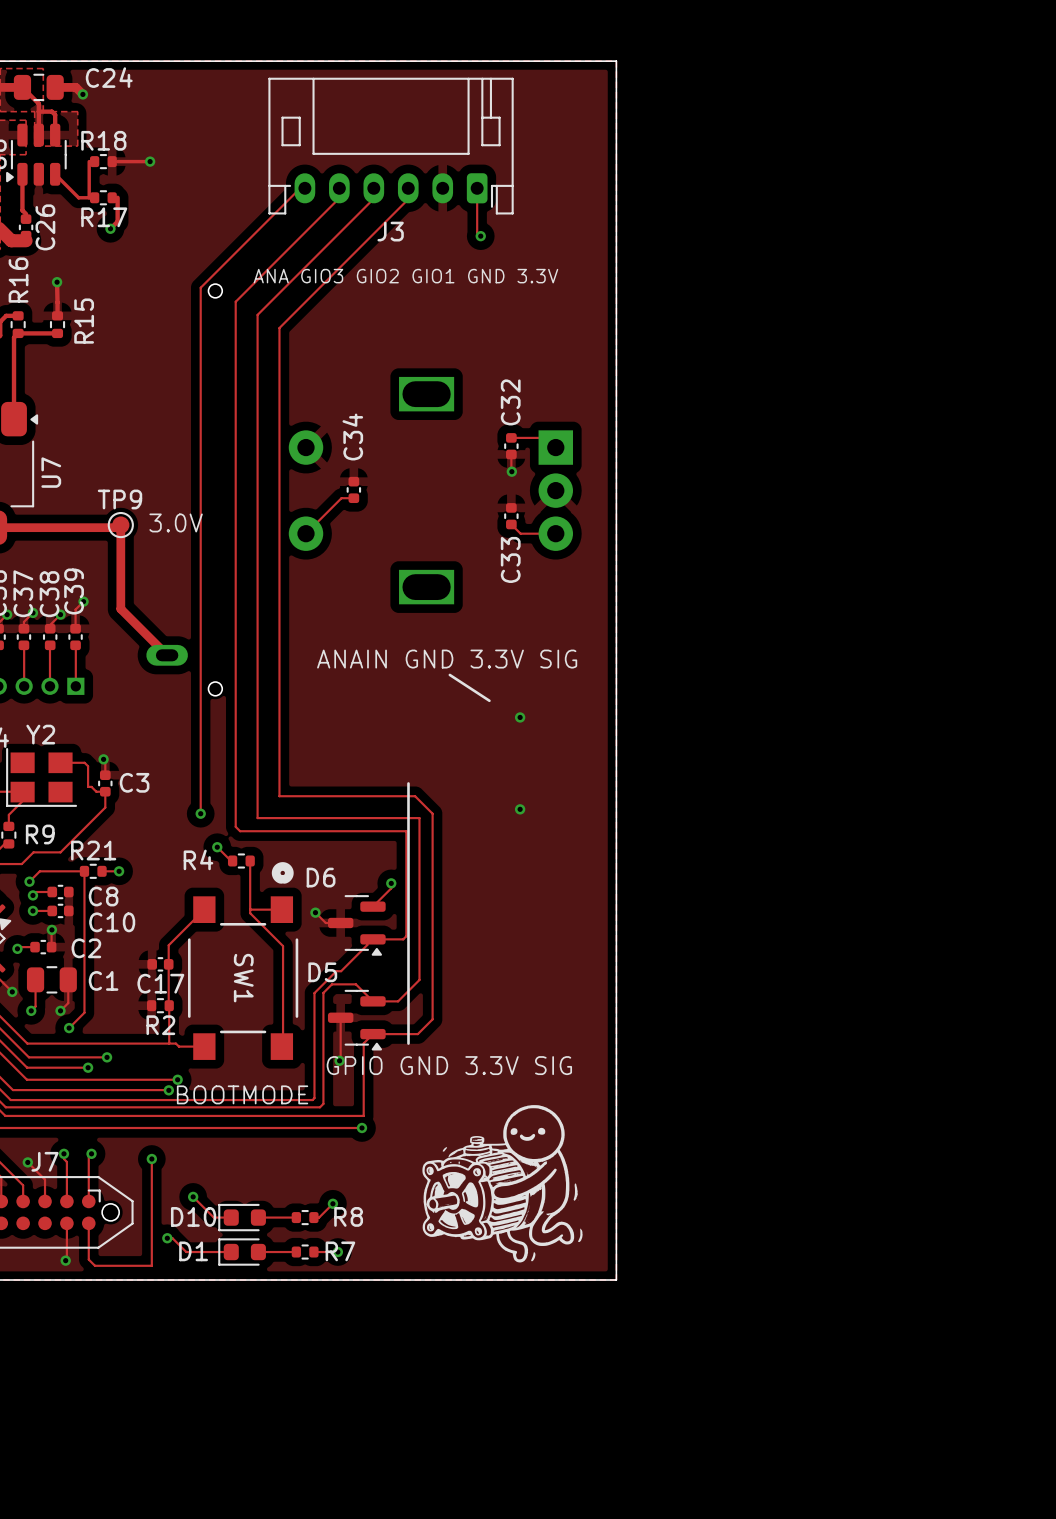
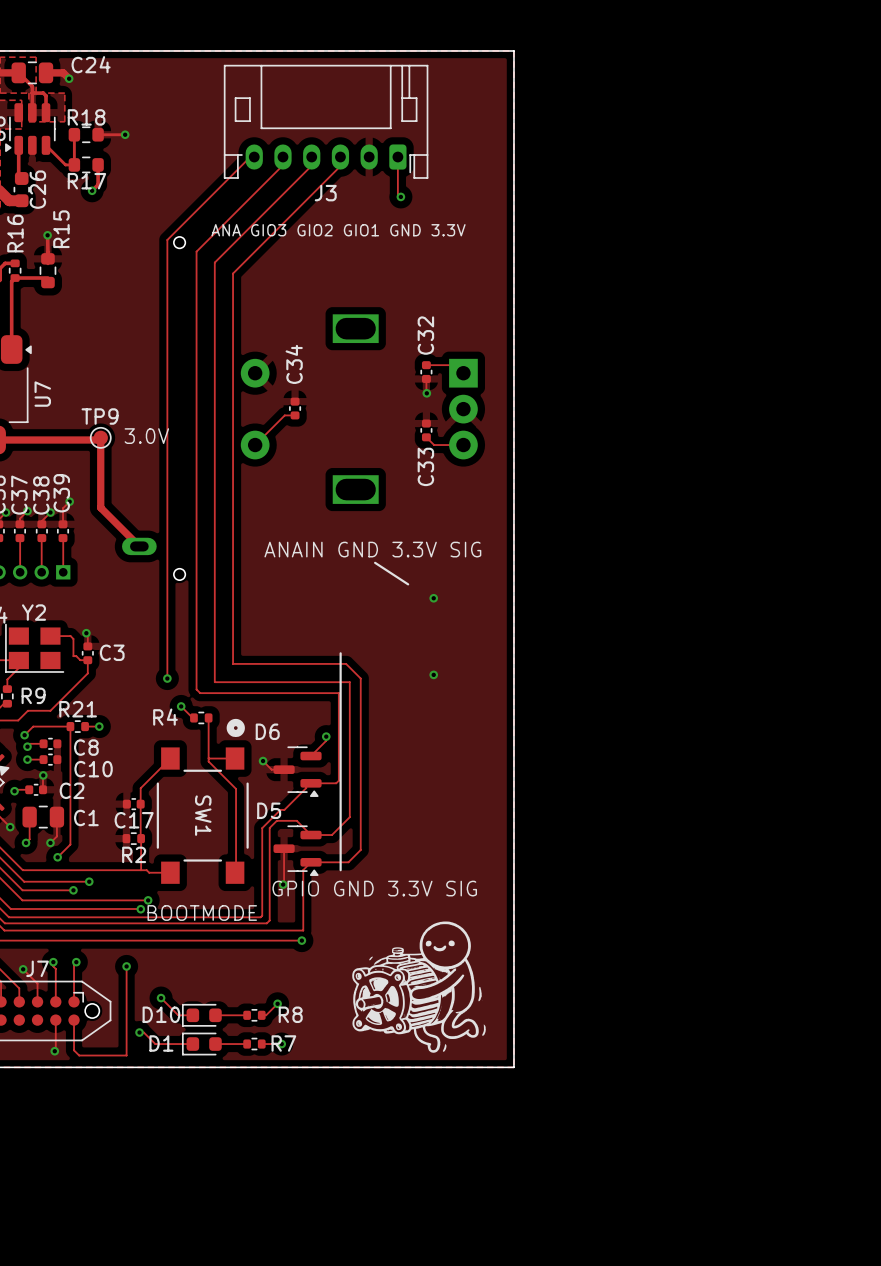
R18 footprint: [89, 154, 117, 170] -> [68, 126, 104, 144]
R17 footprint: [89, 190, 117, 206] -> [68, 156, 104, 174]
C26 footprint: [18, 214, 34, 241] -> [13, 172, 30, 208]
R15 footprint: [49, 311, 66, 339] -> [39, 253, 57, 289]
R15 name position: R15 (84, 321) -> R15 (61, 229)

